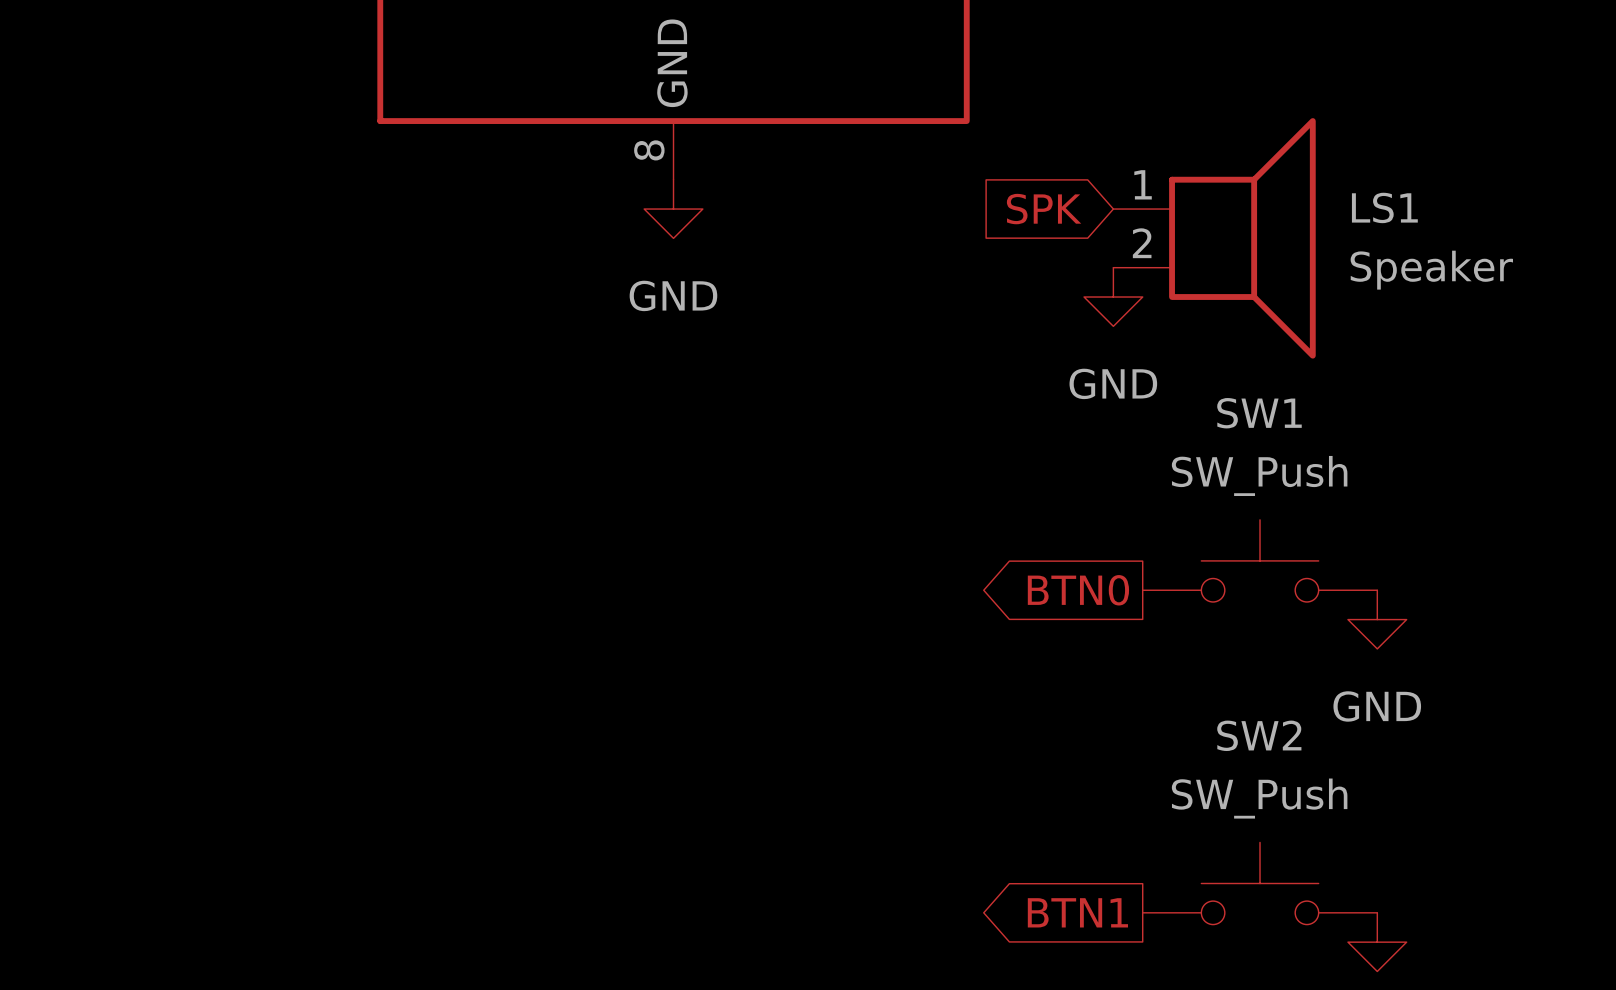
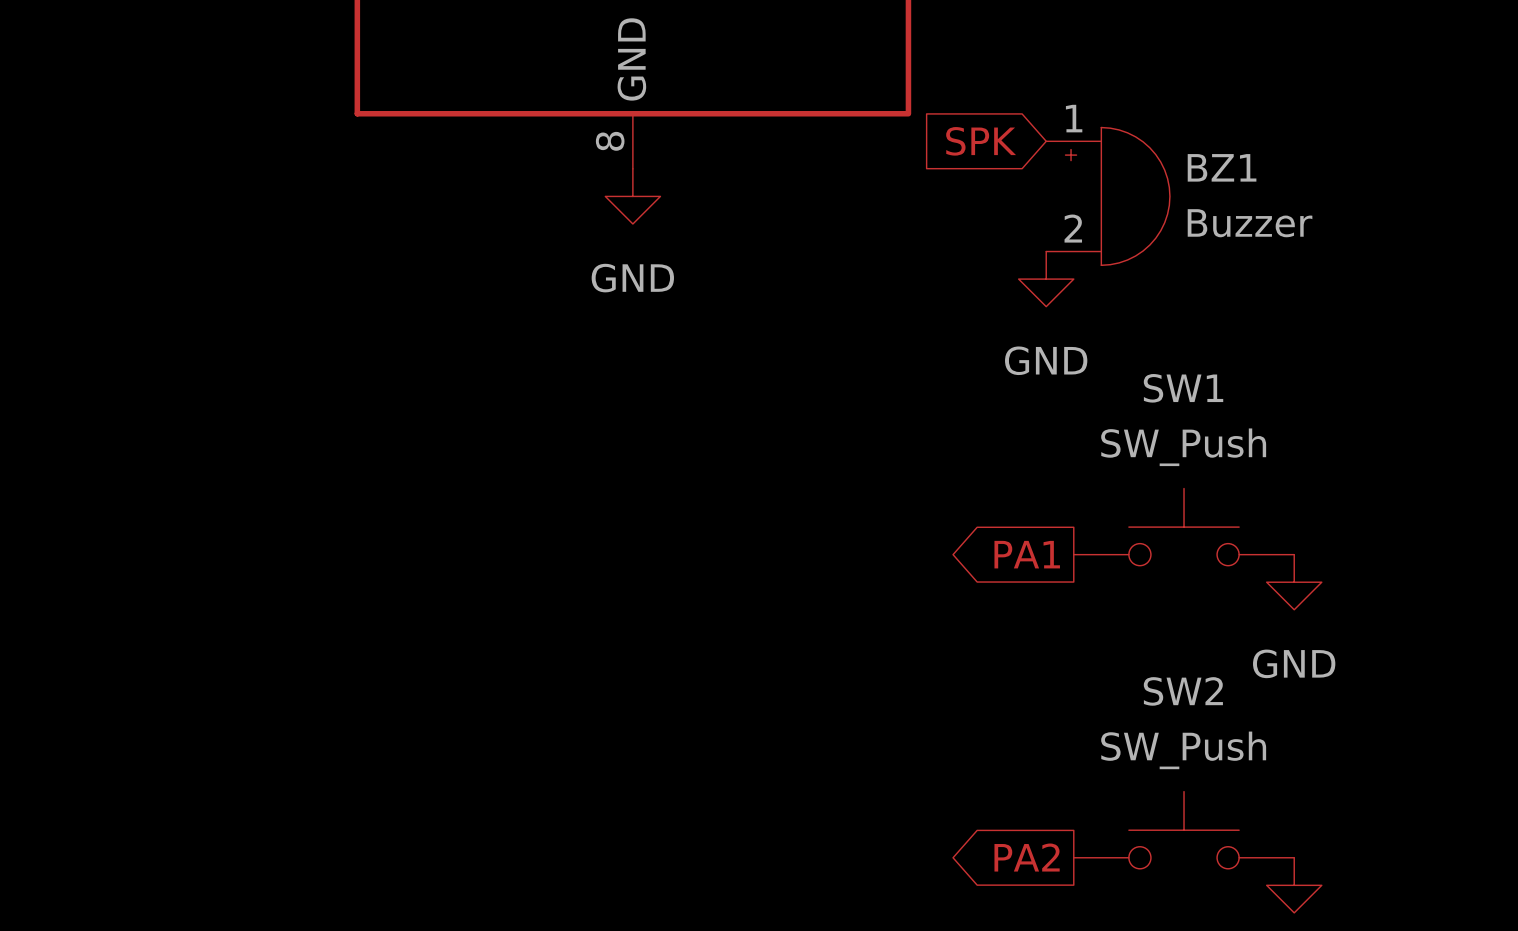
global label position: SPK (1044, 209) -> SPK (981, 141)
BZ1: none -> Buzzer (1108, 196)
LS1: Speaker (1214, 238) -> none
global label: BTN0 (1078, 590) -> PA1 (1027, 554)
global label: BTN1 (1077, 912) -> PA2 (1027, 857)

